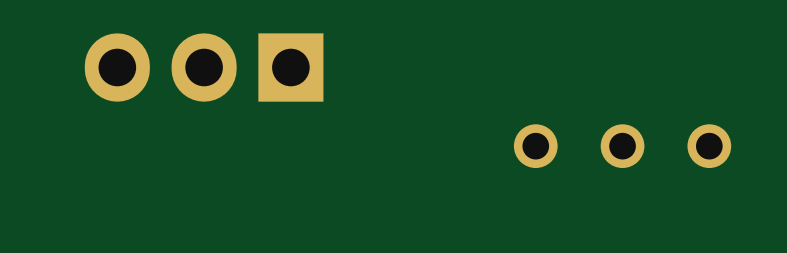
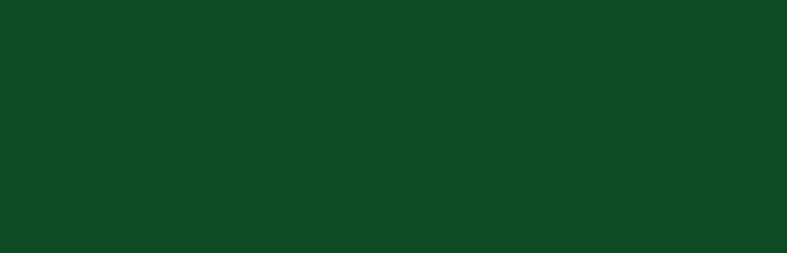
part: (204, 67) -> none
part: (622, 146) -> none

